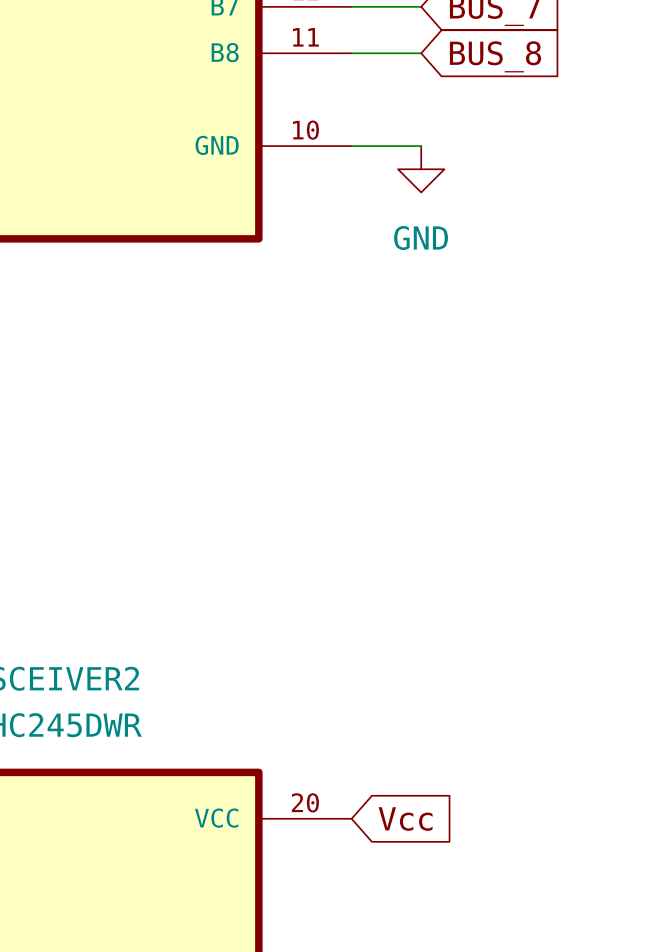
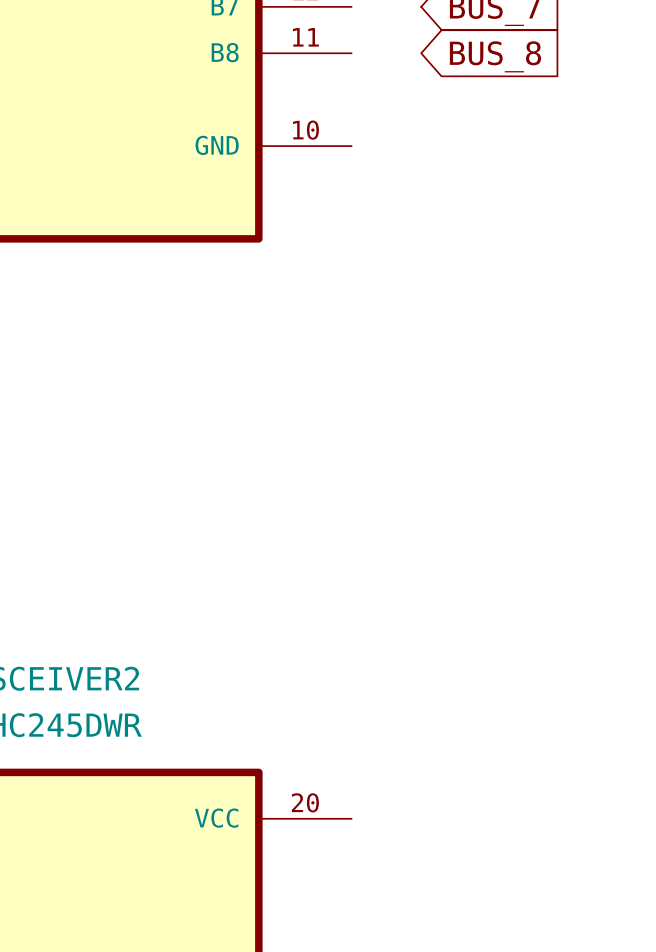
wire: (351, 6) (421, 6) -> none
wire: (351, 53) (421, 53) -> none
wire: (351, 146) (421, 146) -> none
power symbol: GND (421, 169) -> none
global label: Vcc (405, 819) -> none

